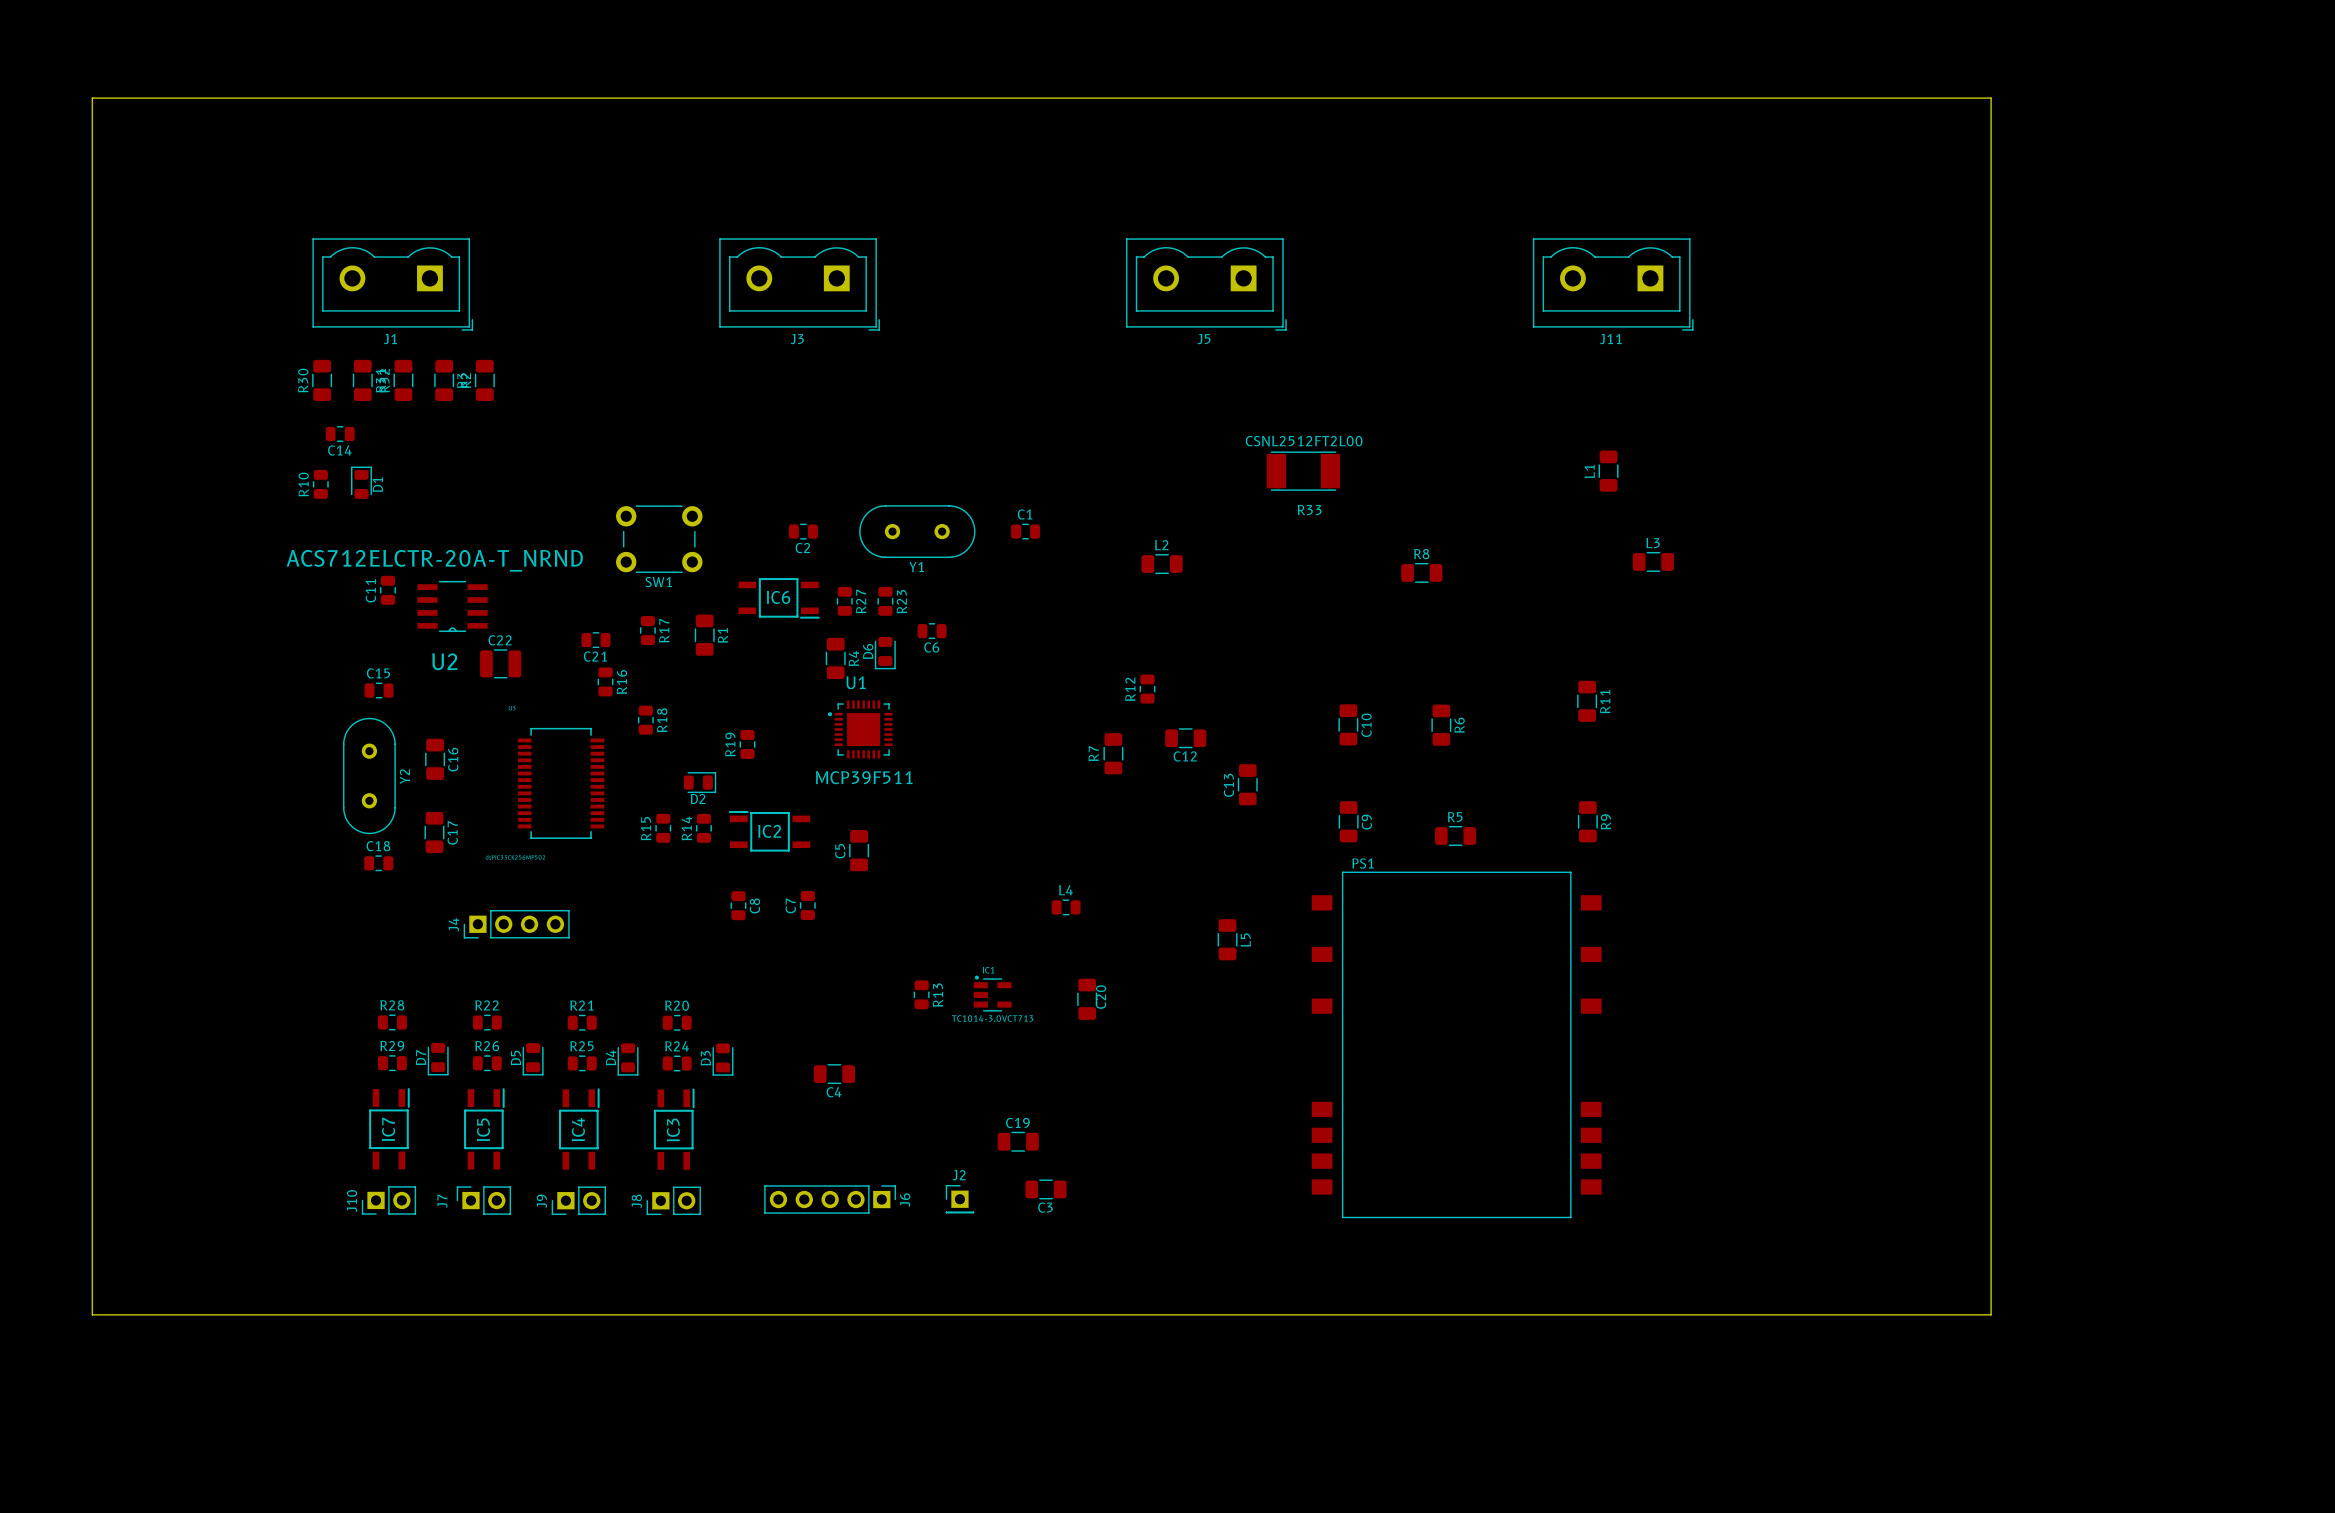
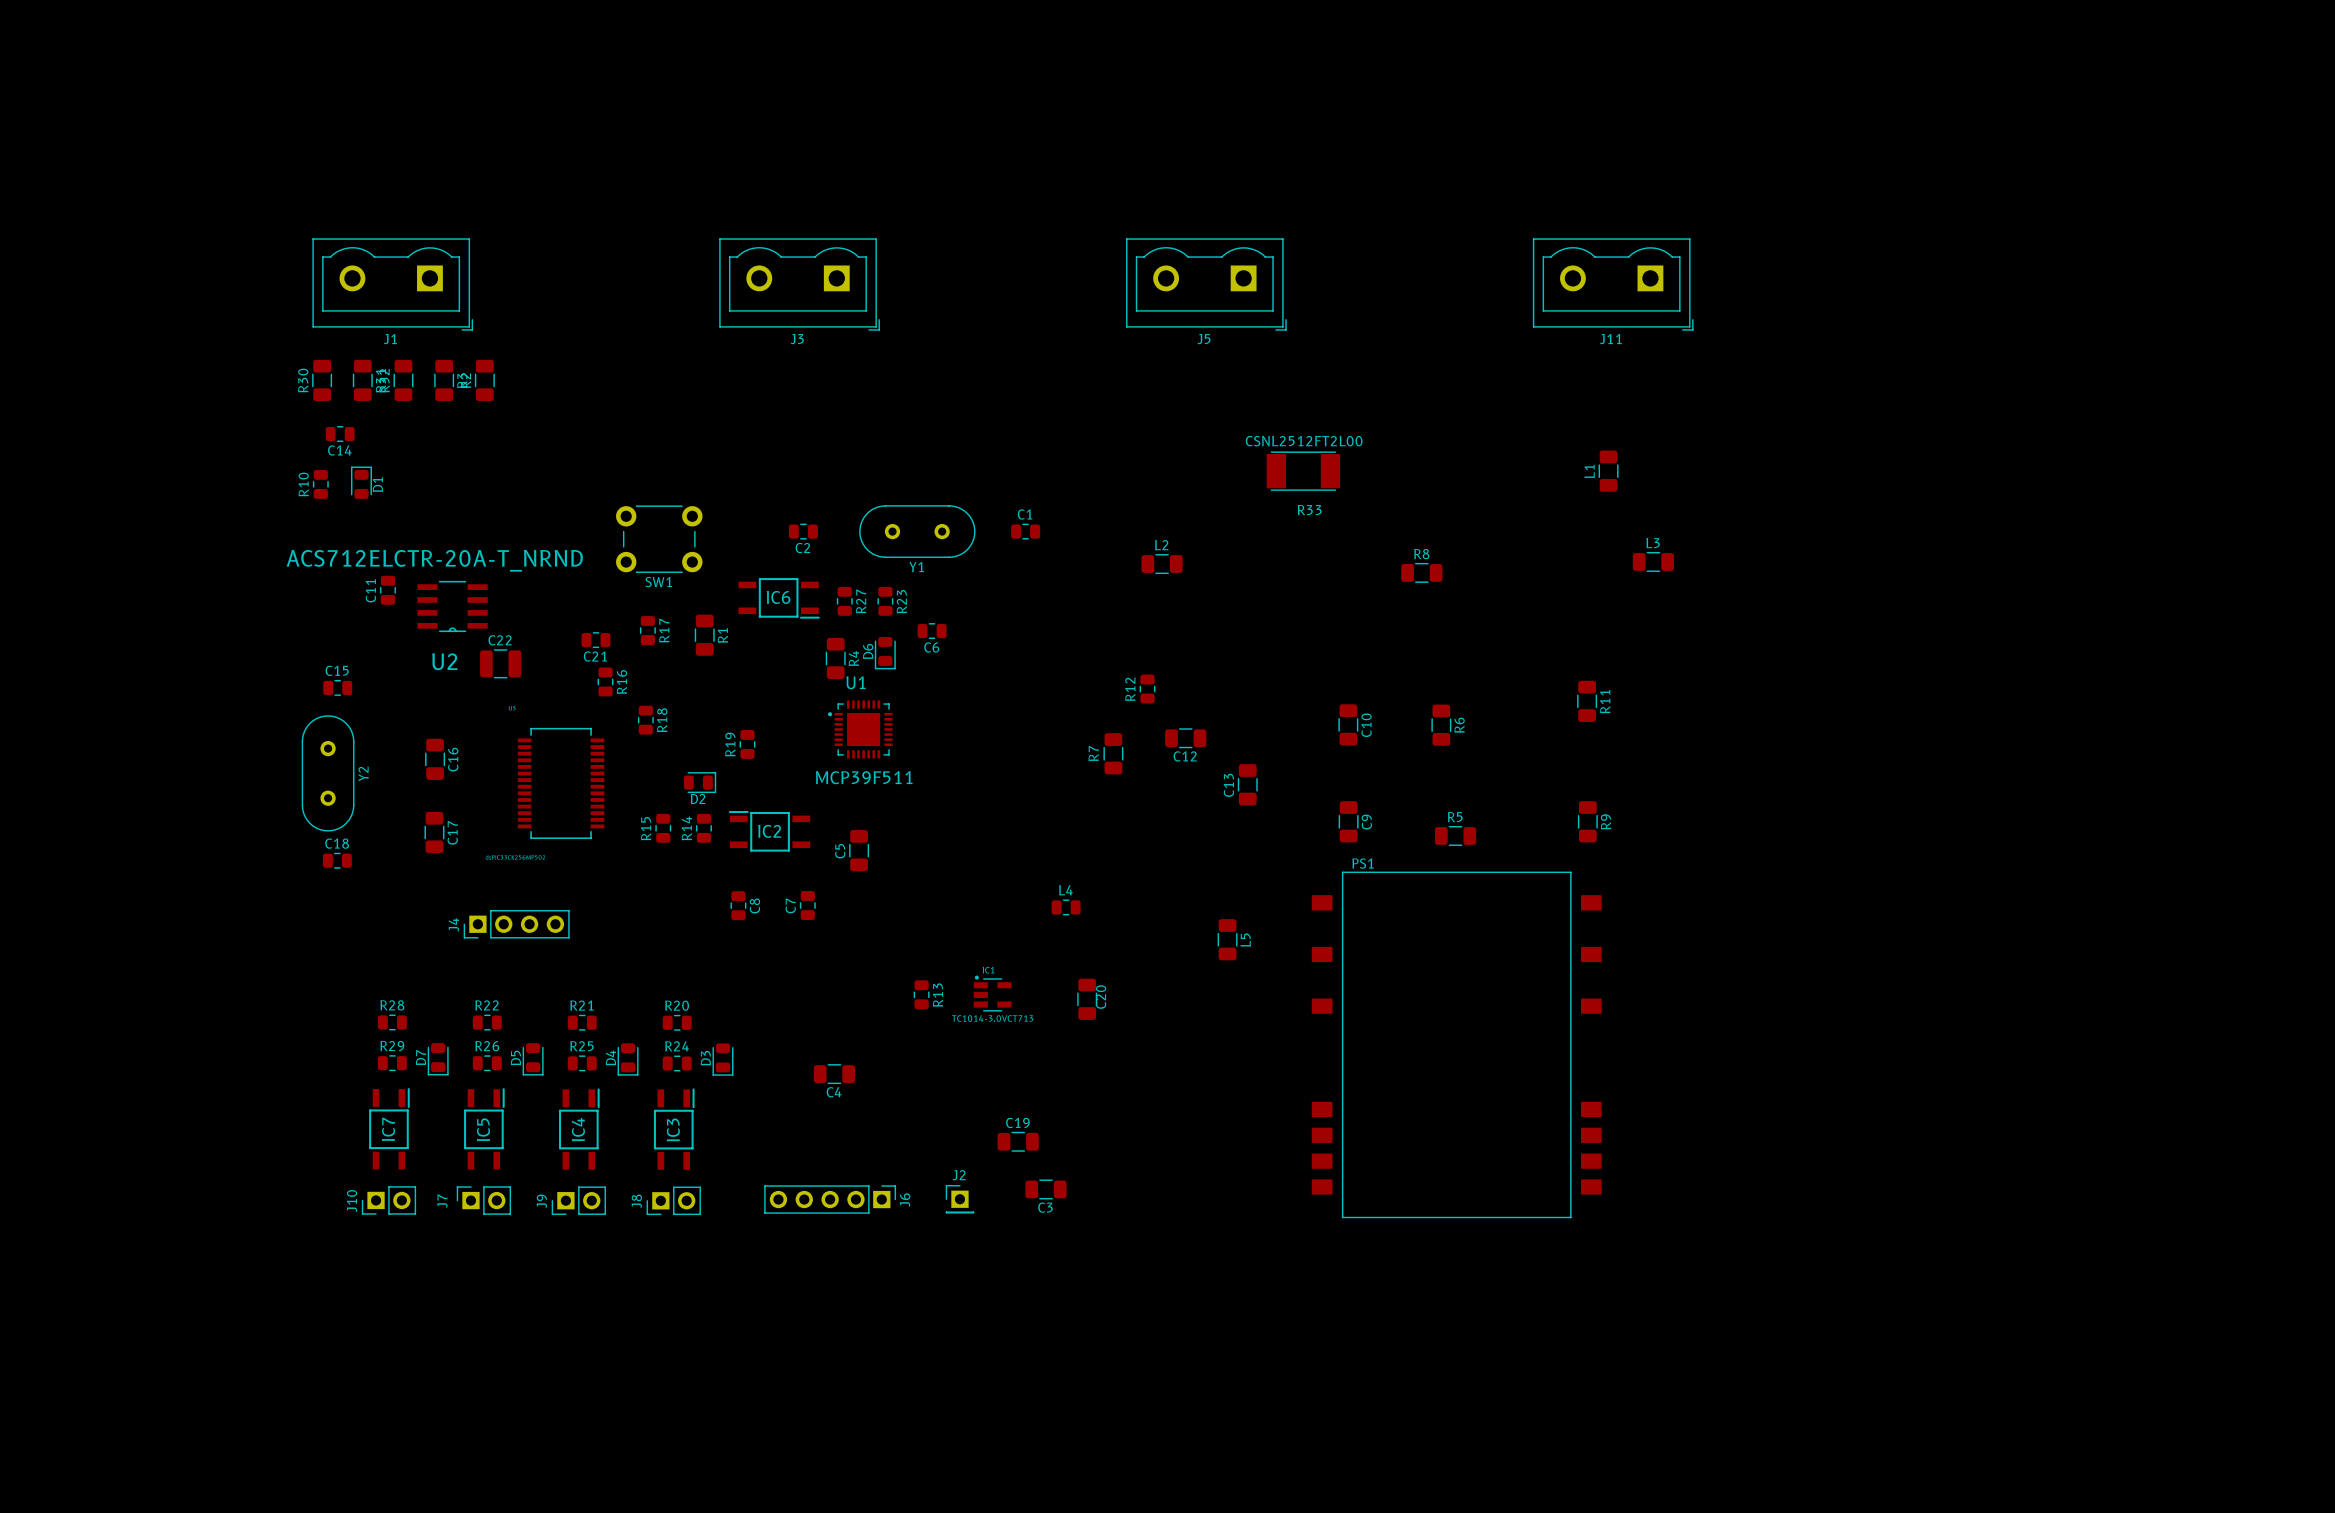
board edge: (92, 98) (92, 1314) (1991, 1314) (1991, 98) (92, 98) -> none
C15 position: (379, 690) -> (337, 687)
Y2 position: (369, 775) -> (328, 773)
C18 position: (378, 863) -> (337, 860)

